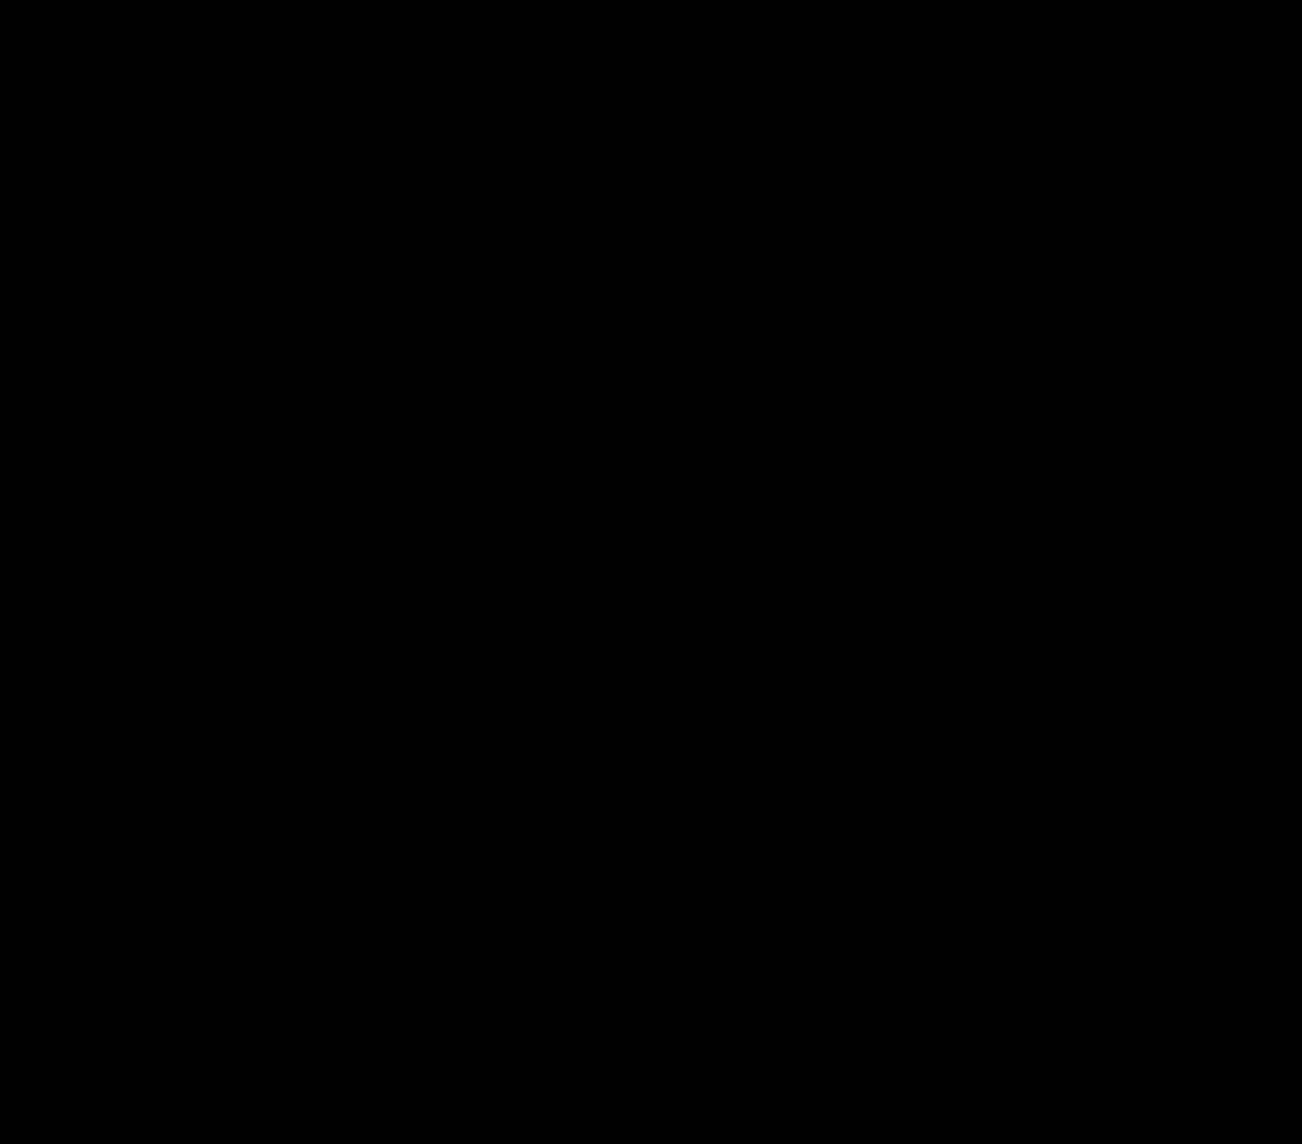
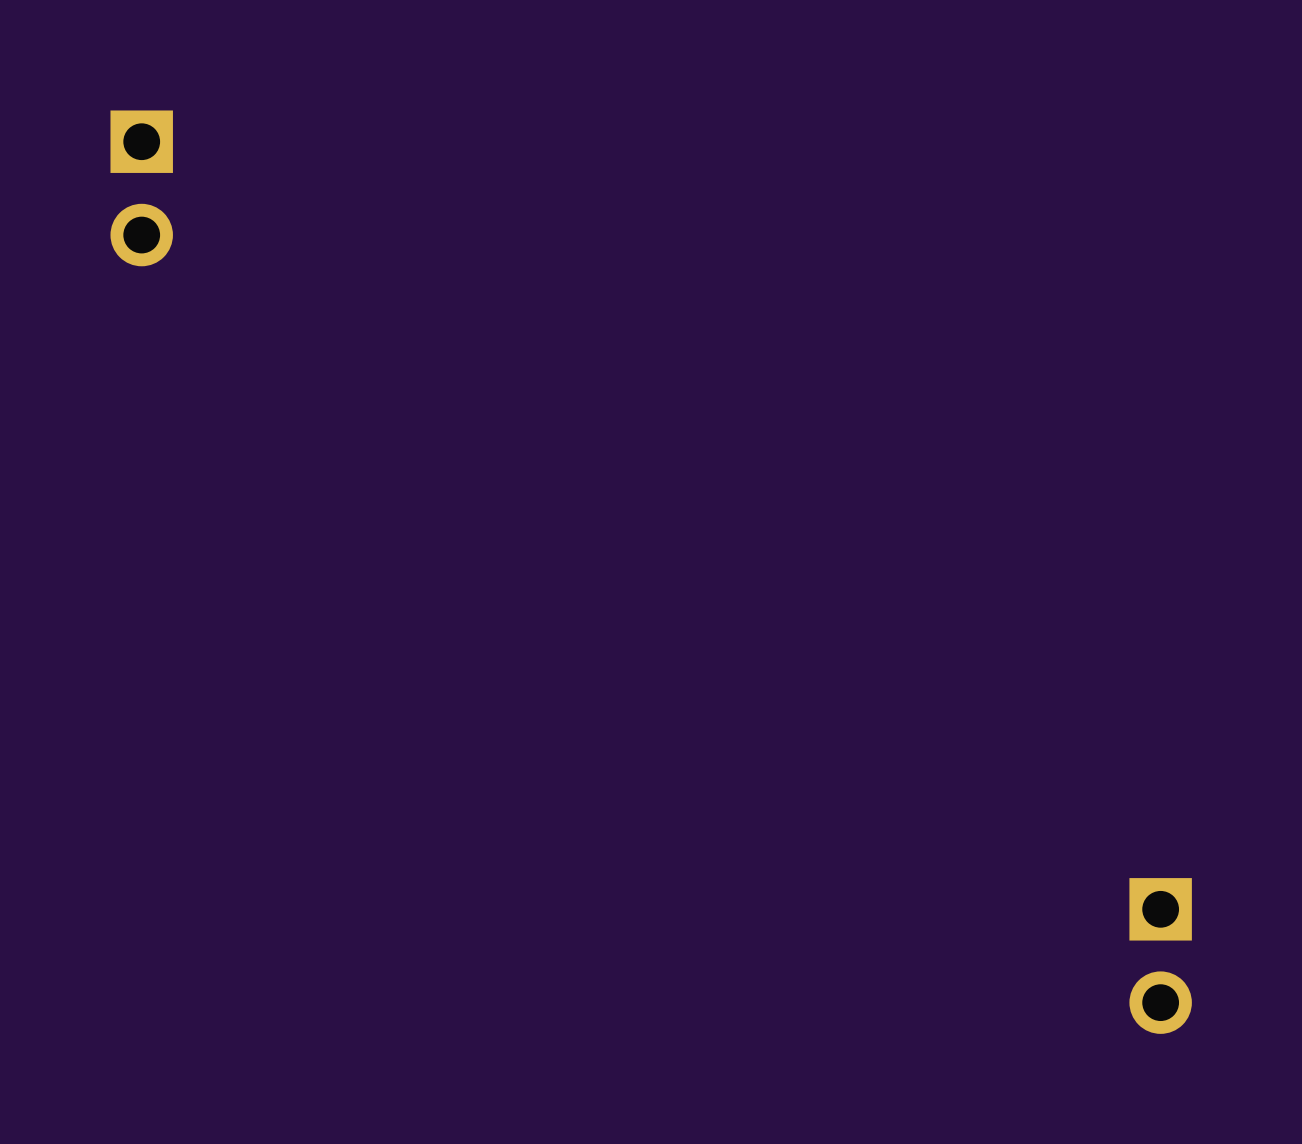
part: none -> (141, 188)
part: none -> (1160, 955)

